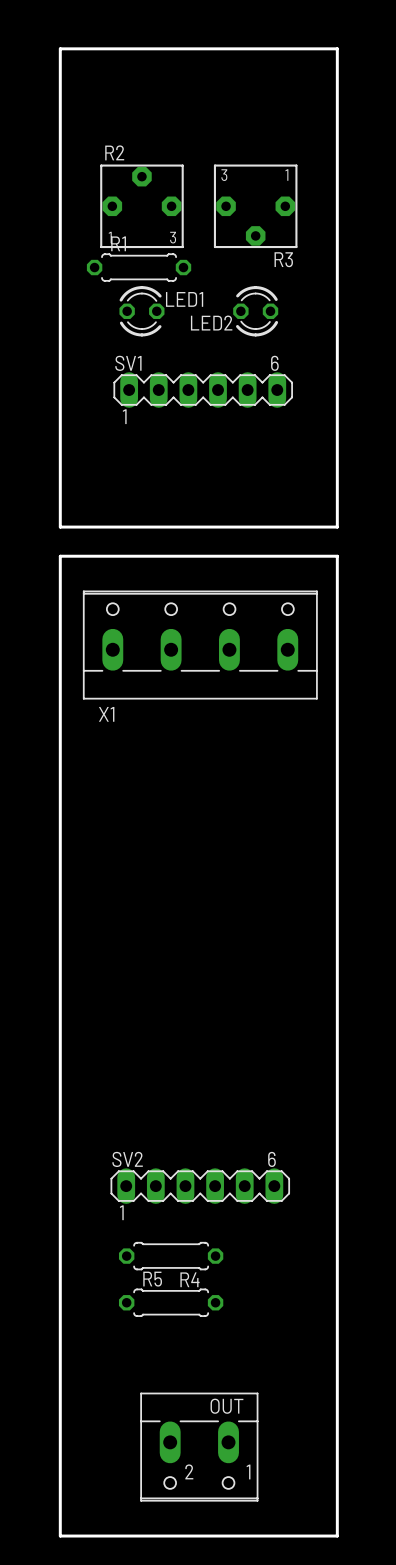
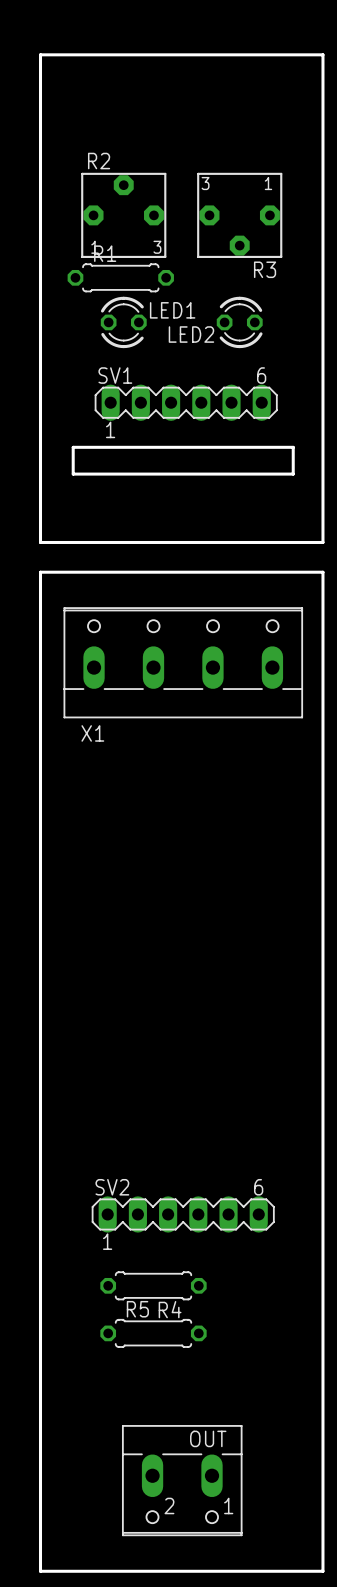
board edge: none -> (73, 447) (293, 447) (293, 474) (73, 474) (73, 447)

